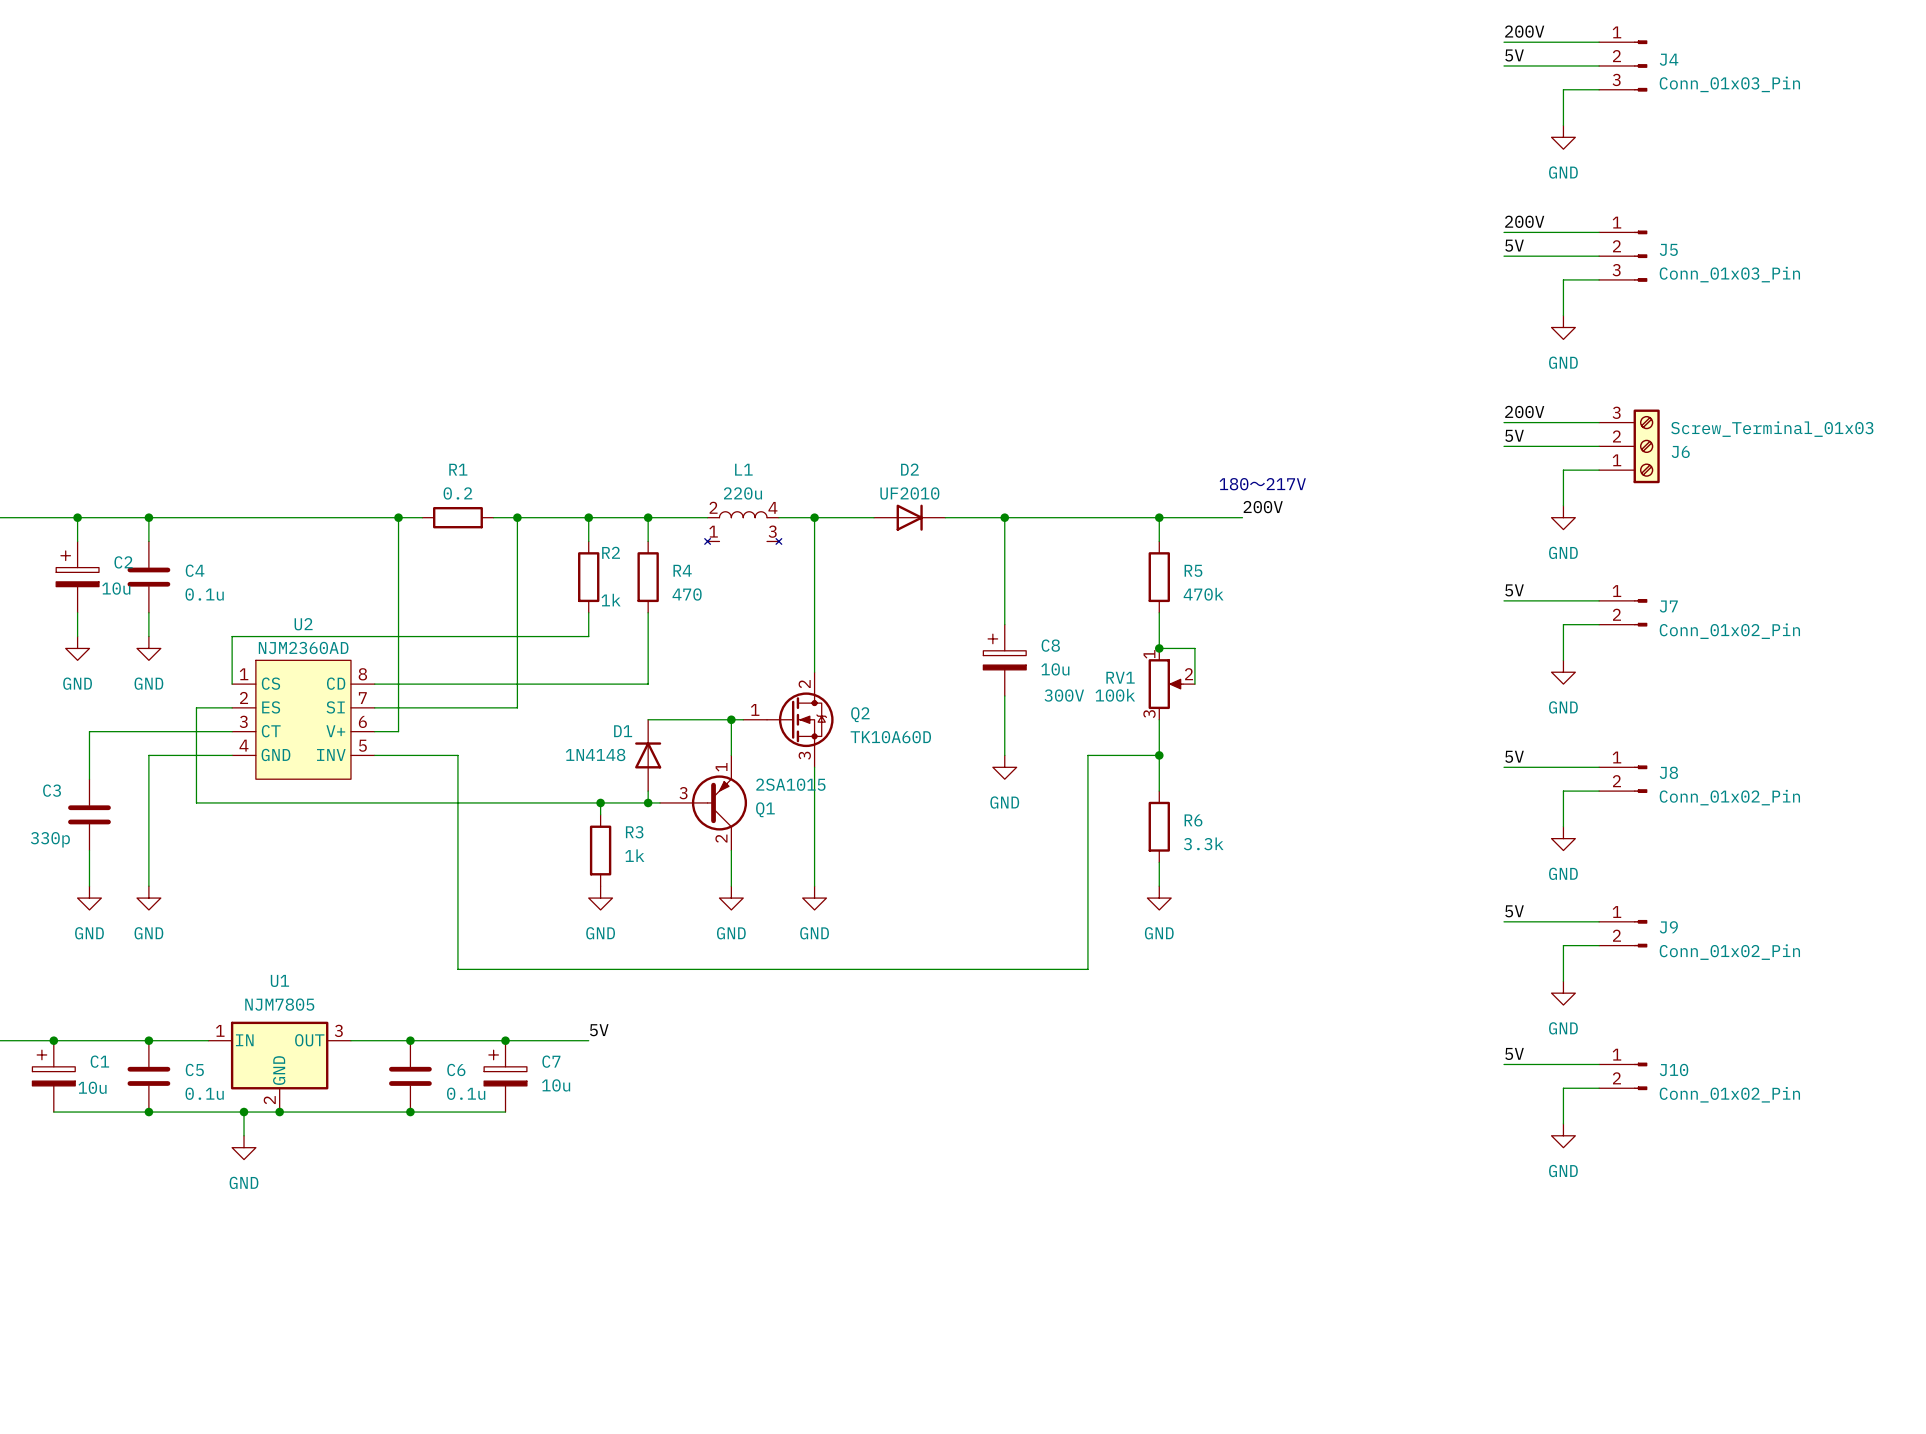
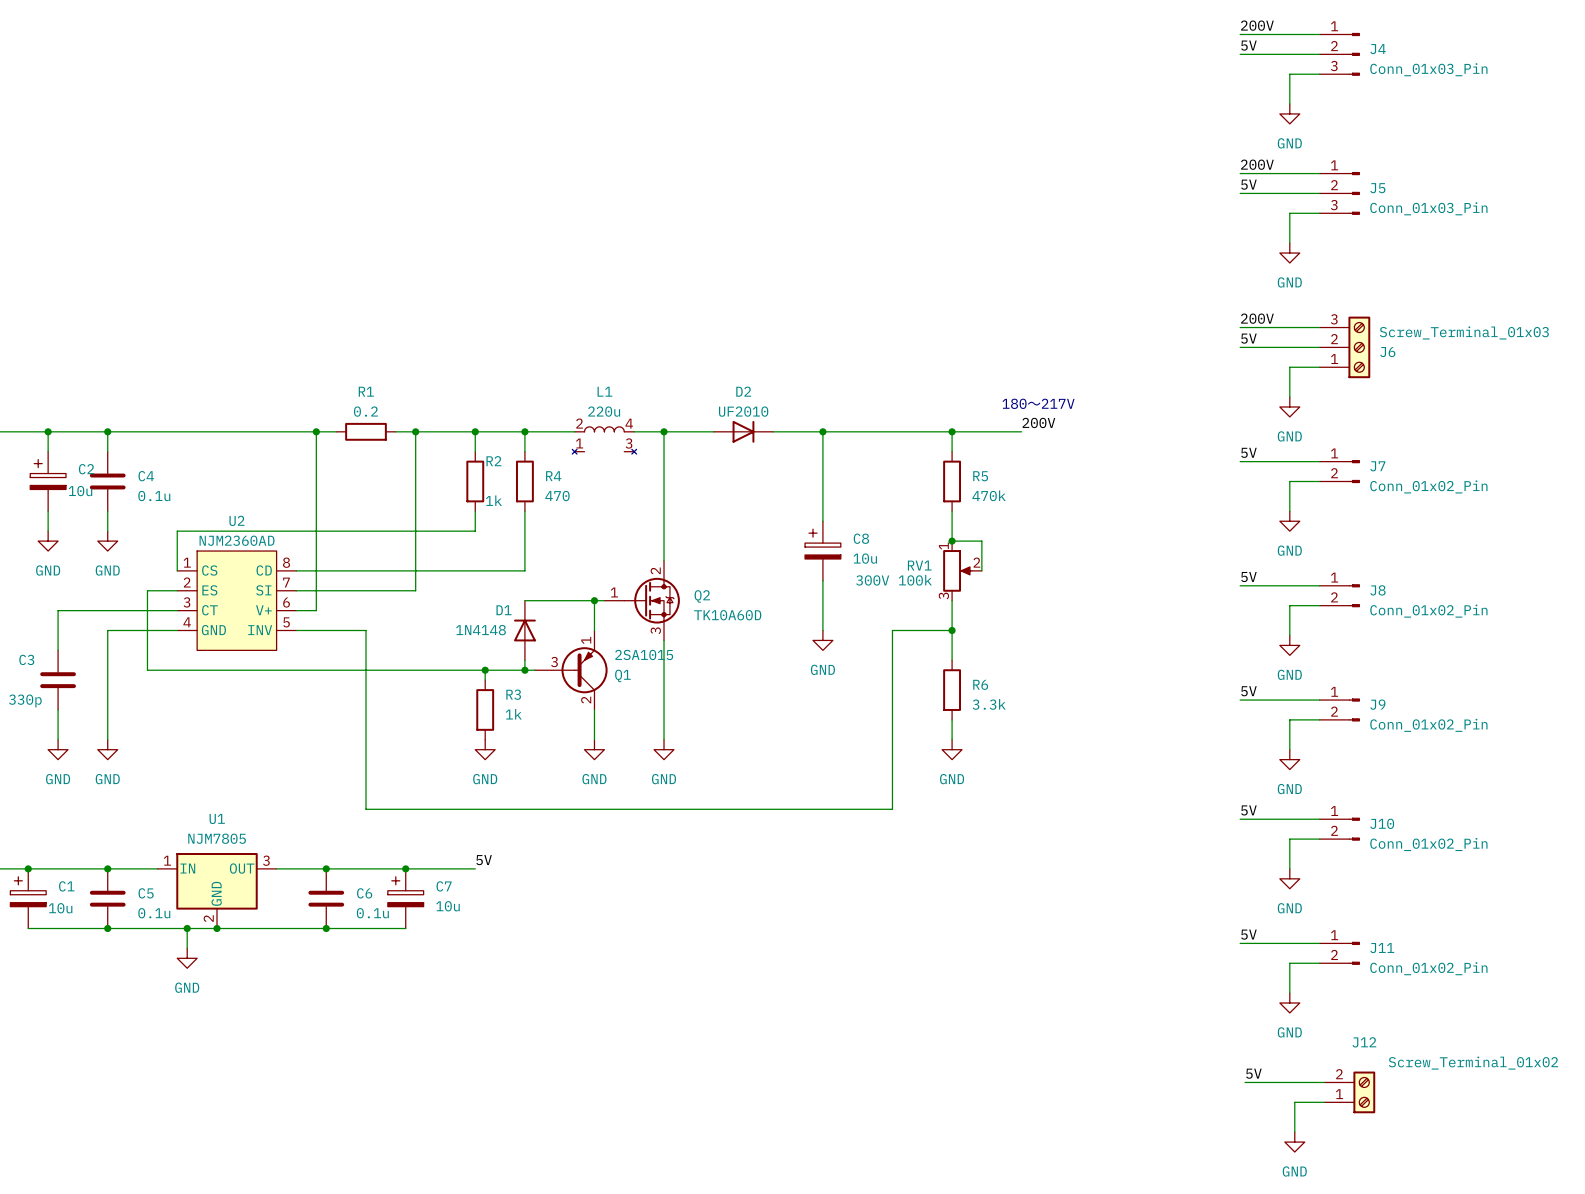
label: none -> 200V (1257, 164)
label: 200V (1524, 221) -> 5V (1248, 184)
label: 5V (1514, 245) -> none
wire: (1504, 256) (1563, 256) -> none
J5 position: (1623, 256) -> (1339, 193)
wire: (1563, 279) (1599, 279) -> (1289, 233) (1289, 213)
power symbol position: GND (1563, 327) -> GND (1289, 253)
wire: none -> (1240, 327) (1319, 327)
label position: 200V (1524, 411) -> 200V (1257, 318)
wire: (1504, 422) (1599, 422) -> (1240, 173) (1319, 173)
label position: 5V (1514, 435) -> 5V (1248, 338)
wire: (1504, 446) (1599, 446) -> (1240, 347) (1319, 347)
J6 position: (1629, 446) -> (1344, 347)
wire: (1563, 470) (1599, 470) -> (1289, 392) (1289, 367) (1319, 367)
wire: (1563, 476) (1563, 505) -> none
power symbol position: GND (1563, 517) -> GND (1289, 406)
label position: 5V (1514, 590) -> 5V (1248, 452)
wire: (1504, 600) (1599, 600) -> (1240, 585) (1319, 585)
J7 position: (1623, 612) -> (1339, 471)
wire: (1599, 624) (1563, 624) (1563, 660) -> (1319, 605) (1289, 605) (1289, 635)
power symbol position: GND (1563, 672) -> GND (1289, 521)
label: none -> 5V (1248, 577)
label: 5V (1514, 756) -> none
wire: (1504, 767) (1599, 767) -> (1240, 461) (1319, 461)
power symbol: none -> GND (1289, 645)
J8 position: (1623, 779) -> (1339, 595)
wire: (1599, 791) (1563, 791) (1563, 826) -> (1319, 481) (1289, 481) (1289, 511)
label: none -> 5V (1248, 691)
power symbol: GND (1563, 838) -> none
power symbol: none -> GND (1289, 759)
label: 5V (1514, 911) -> none
wire: (1504, 921) (1599, 921) -> (1240, 700) (1319, 700)
J9 position: (1623, 933) -> (1339, 709)
wire: (1599, 945) (1563, 945) (1563, 981) -> (1319, 719) (1289, 719) (1289, 749)
label: none -> 5V (1248, 810)
power symbol: GND (1563, 993) -> none
power symbol: none -> GND (1289, 878)
label: 5V (1514, 1053) -> none
wire: (1504, 1064) (1599, 1064) -> (1240, 819) (1319, 819)
J10 position: (1623, 1076) -> (1339, 829)
wire: (1599, 1088) (1563, 1088) (1563, 1123) -> (1319, 839) (1289, 839) (1289, 868)
label: none -> 5V (1248, 934)
wire: none -> (1240, 943) (1319, 943)
power symbol: GND (1563, 1135) -> none
J11: none -> Conn_01x02_Pin (1339, 953)
wire: none -> (1319, 963) (1289, 963) (1289, 993)
power symbol: none -> GND (1289, 1003)
label: none -> 5V (1253, 1073)
wire: none -> (1245, 1082) (1324, 1082)
J12: none -> Screw_Terminal_01x02 (1349, 1092)
wire: none -> (1324, 1102) (1294, 1102) (1294, 1132)
power symbol: none -> GND (1294, 1142)

